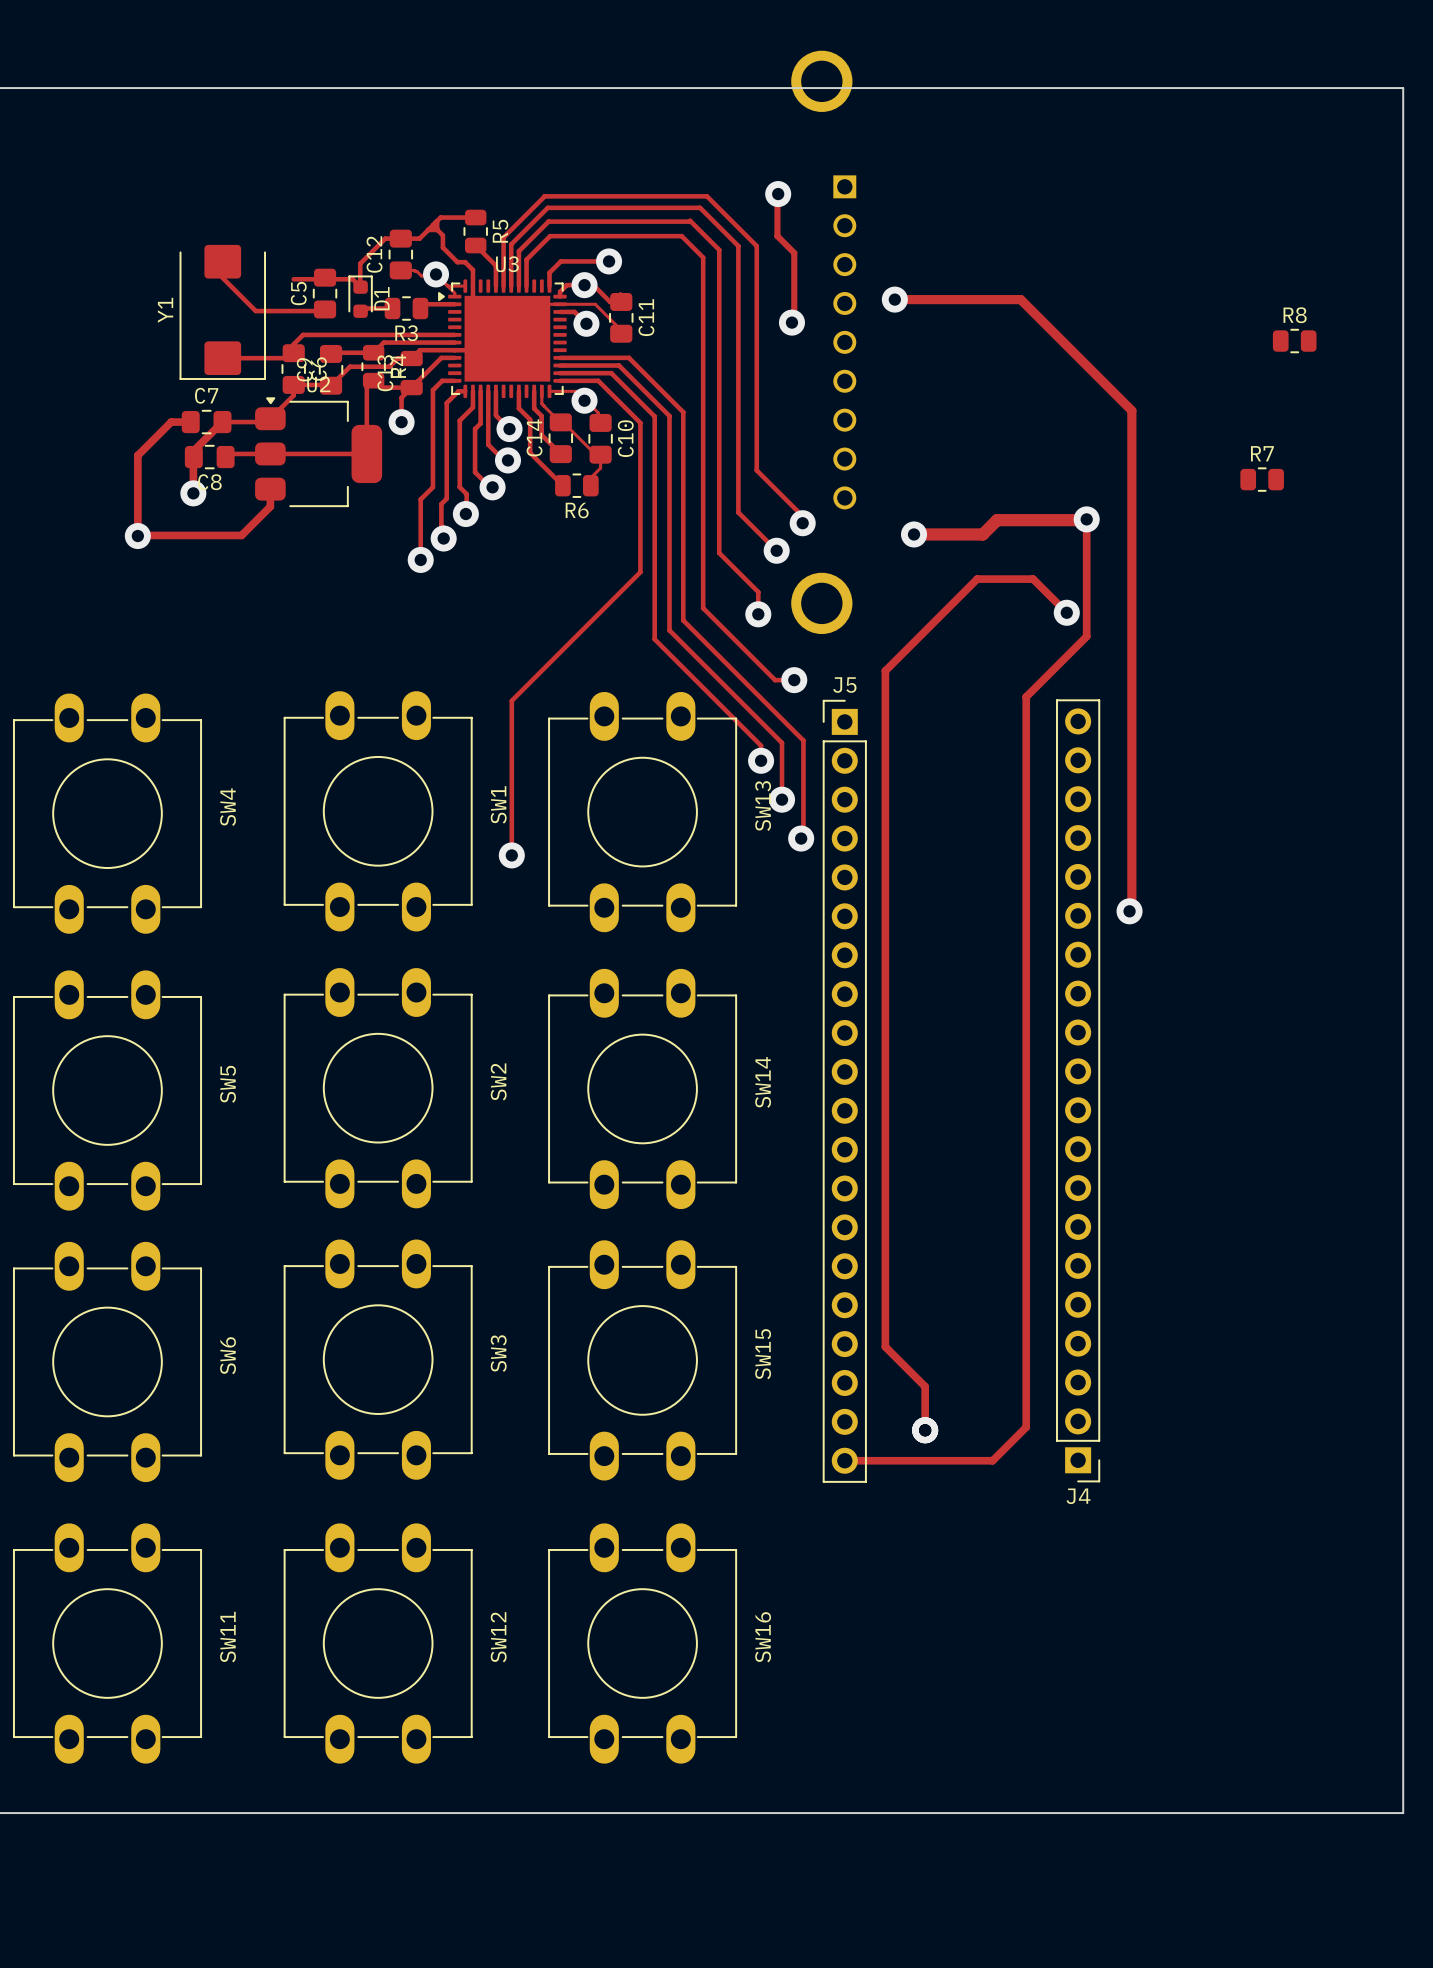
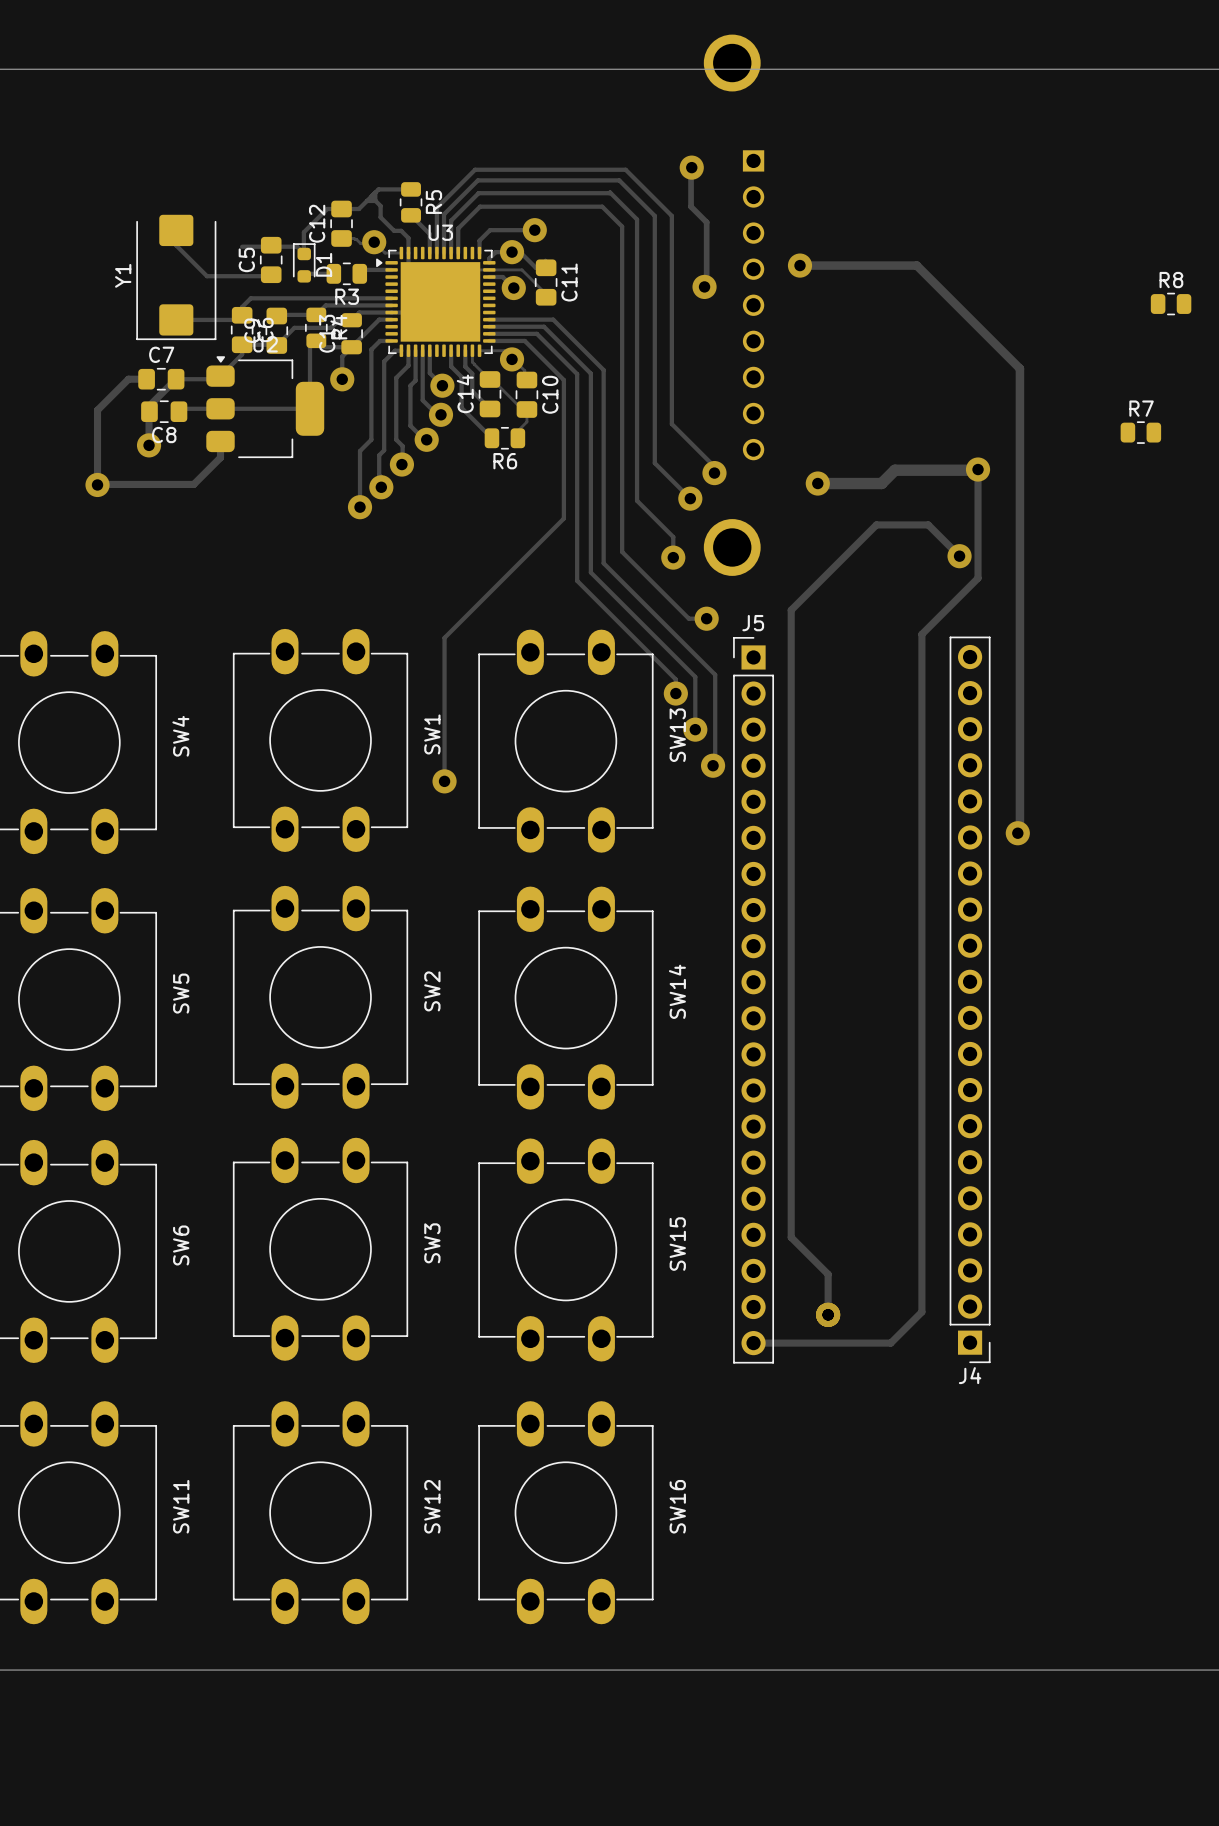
track: (447, 286) (454, 293) (454, 296) -> none

